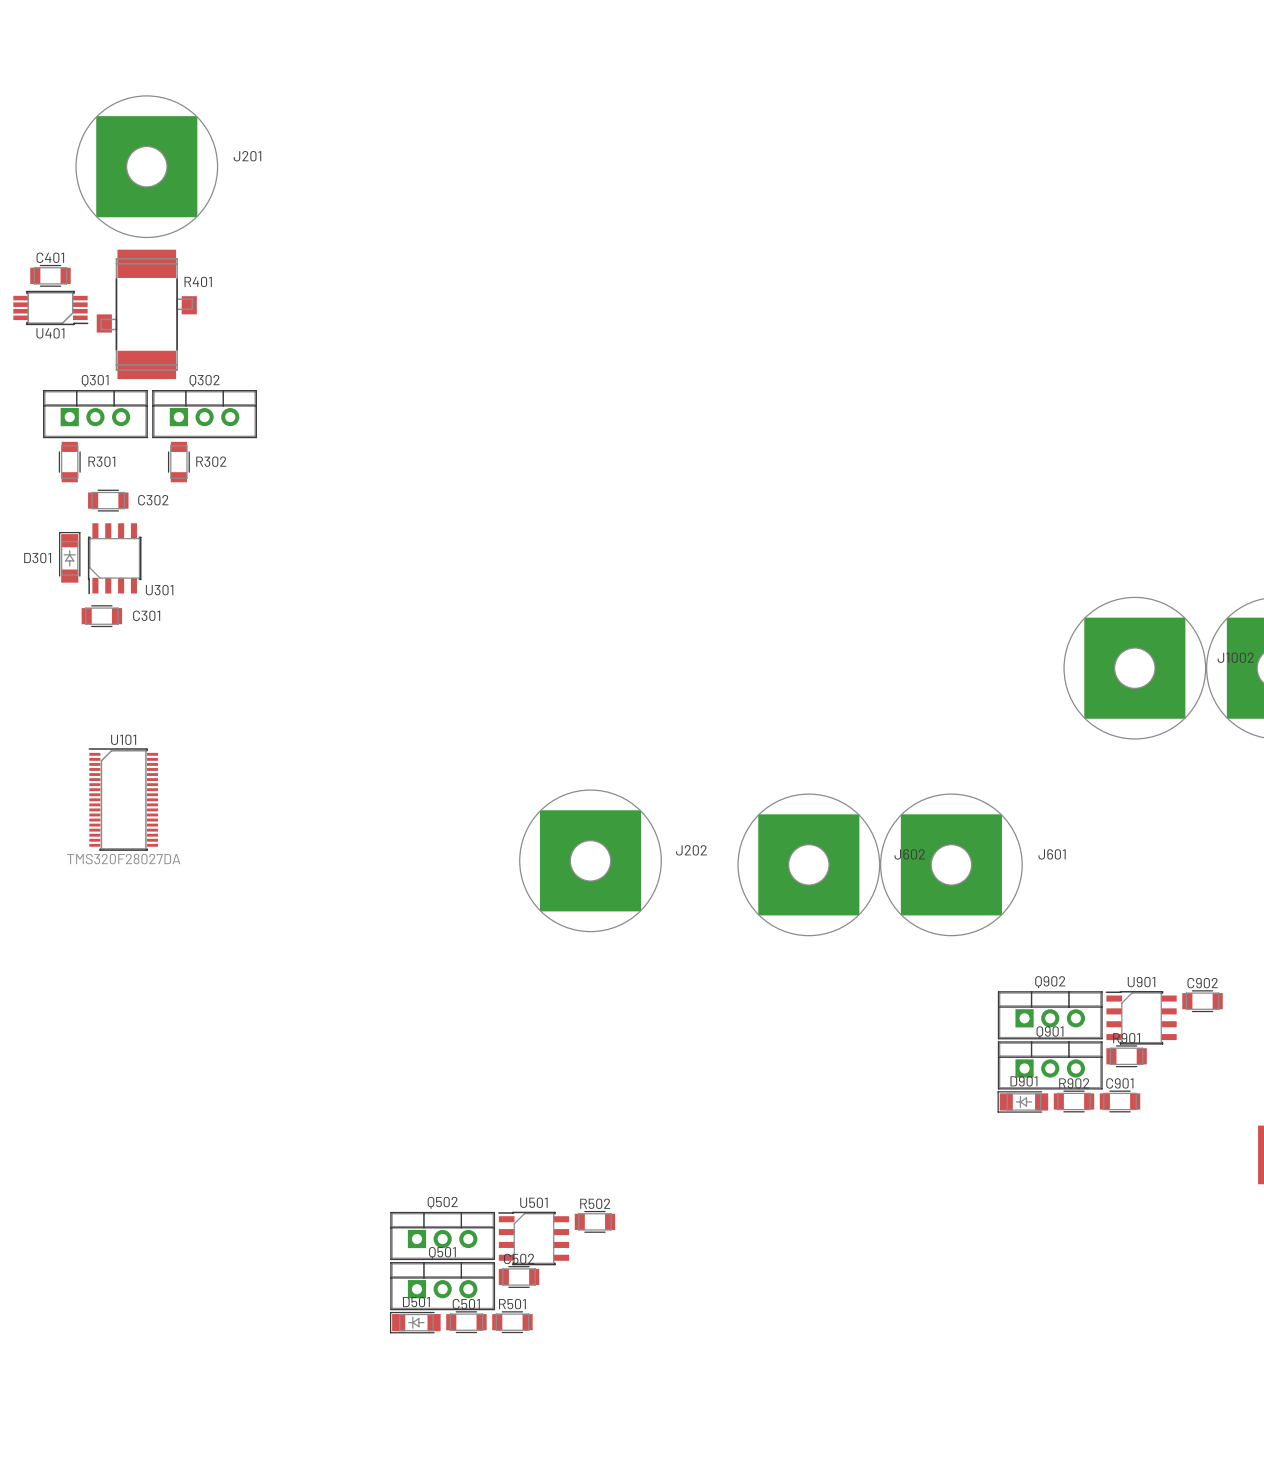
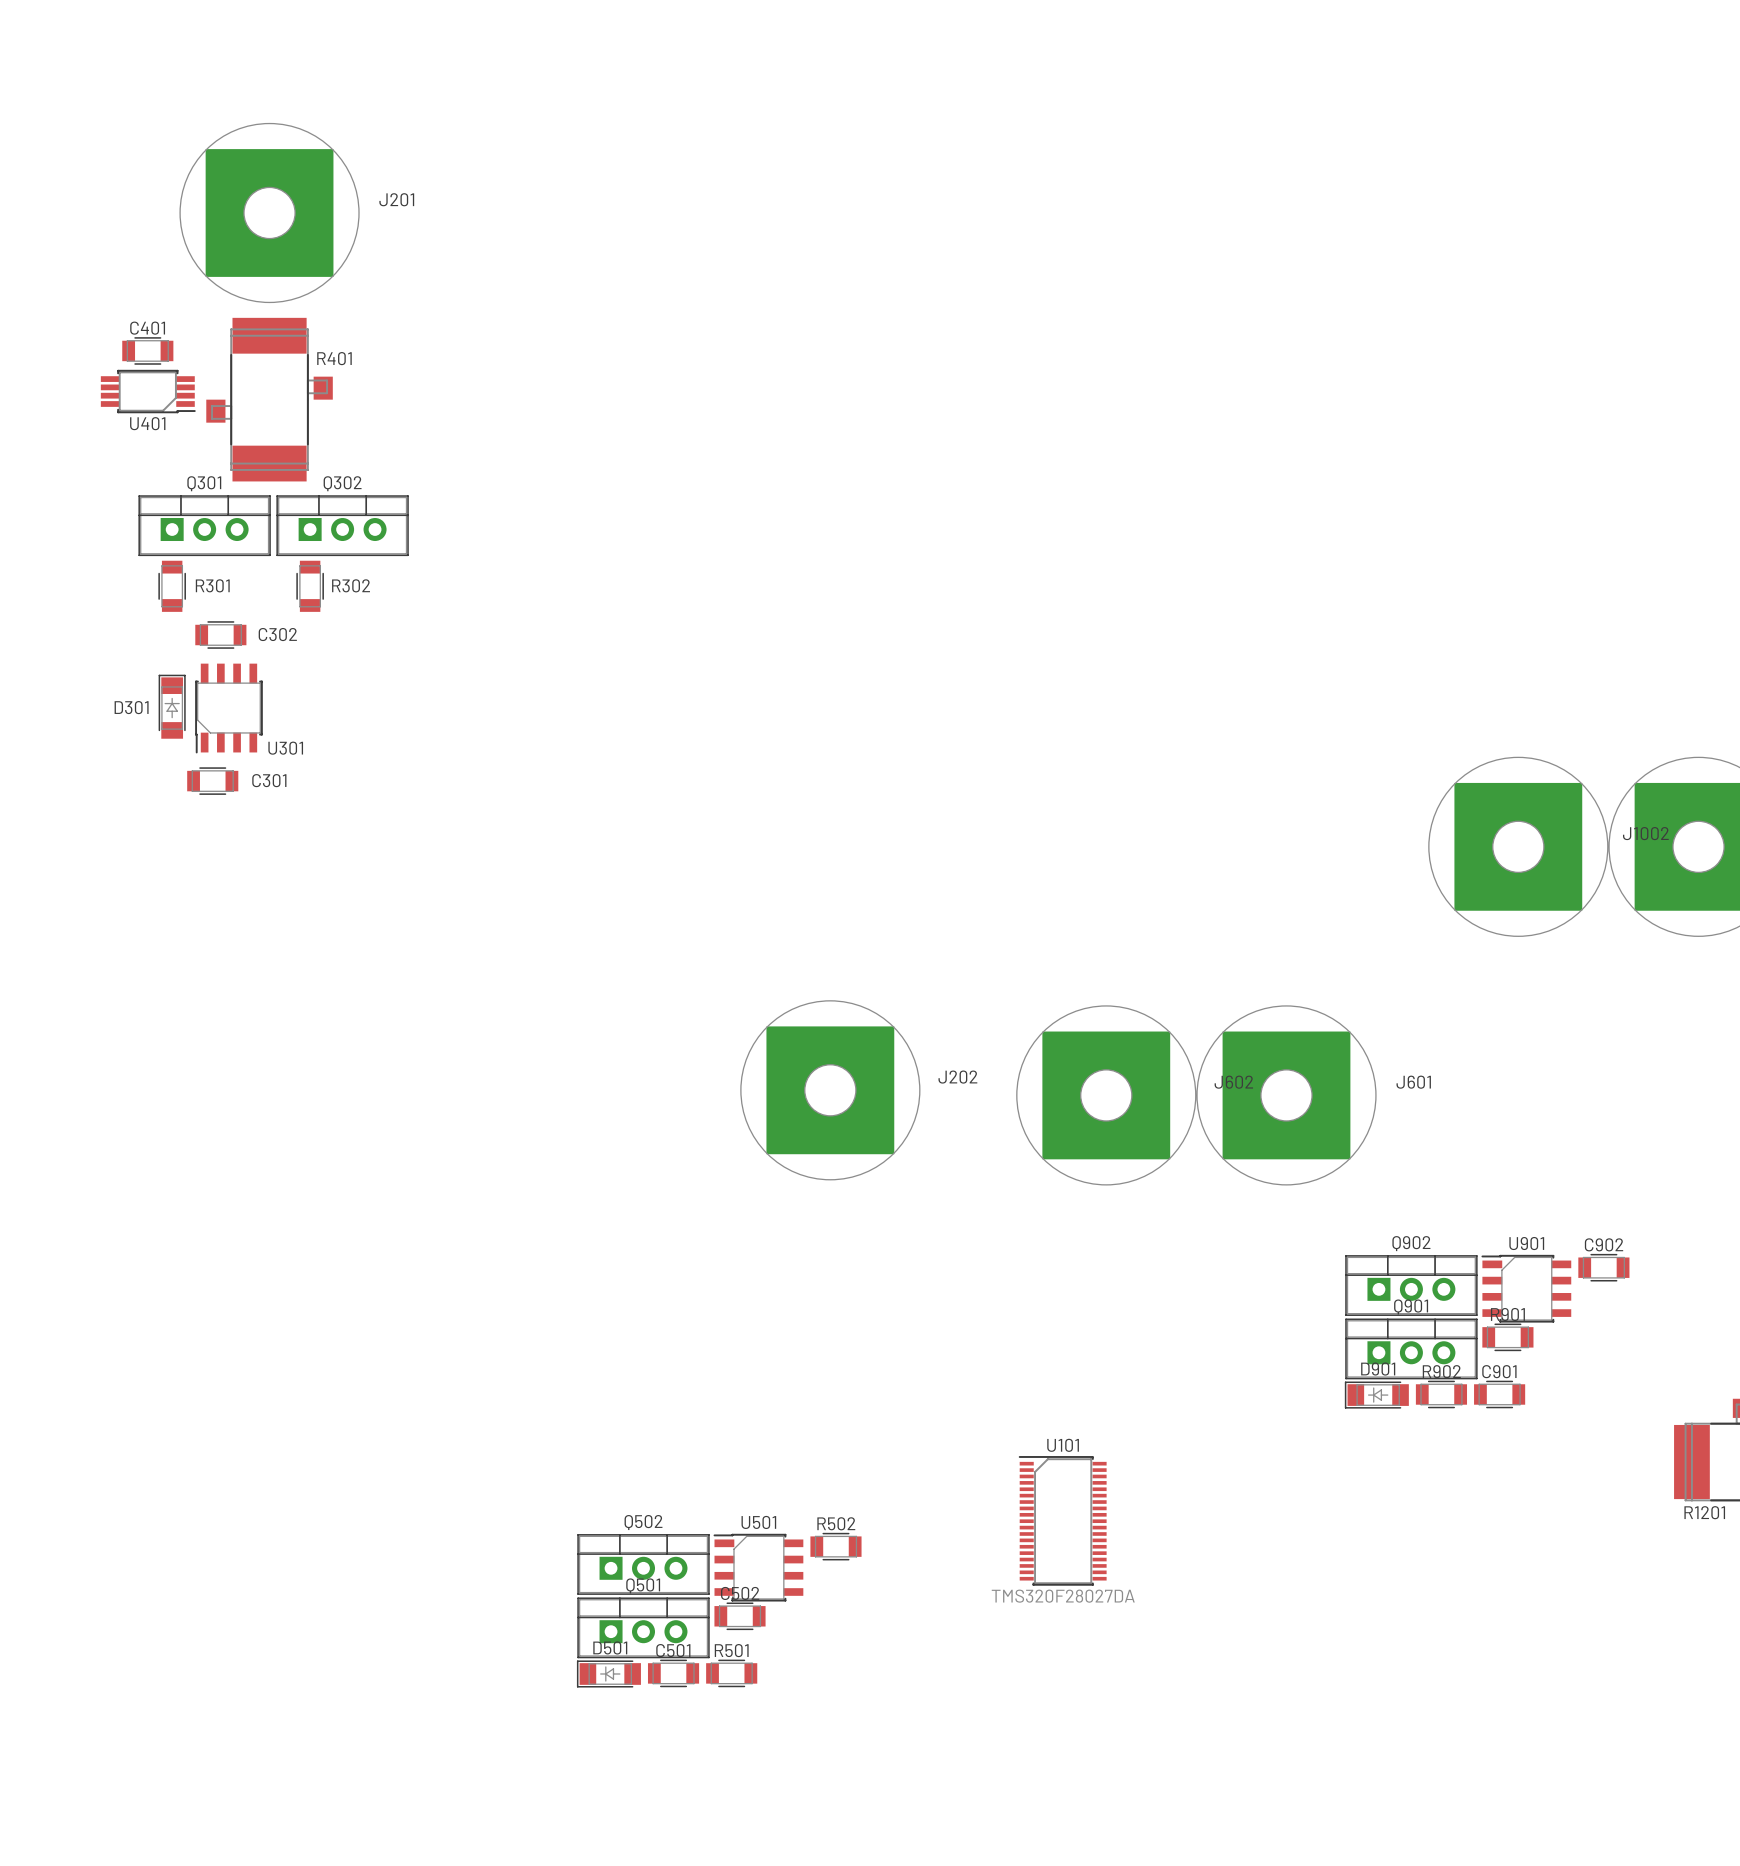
U101 position: (123, 799) -> (1062, 1520)

